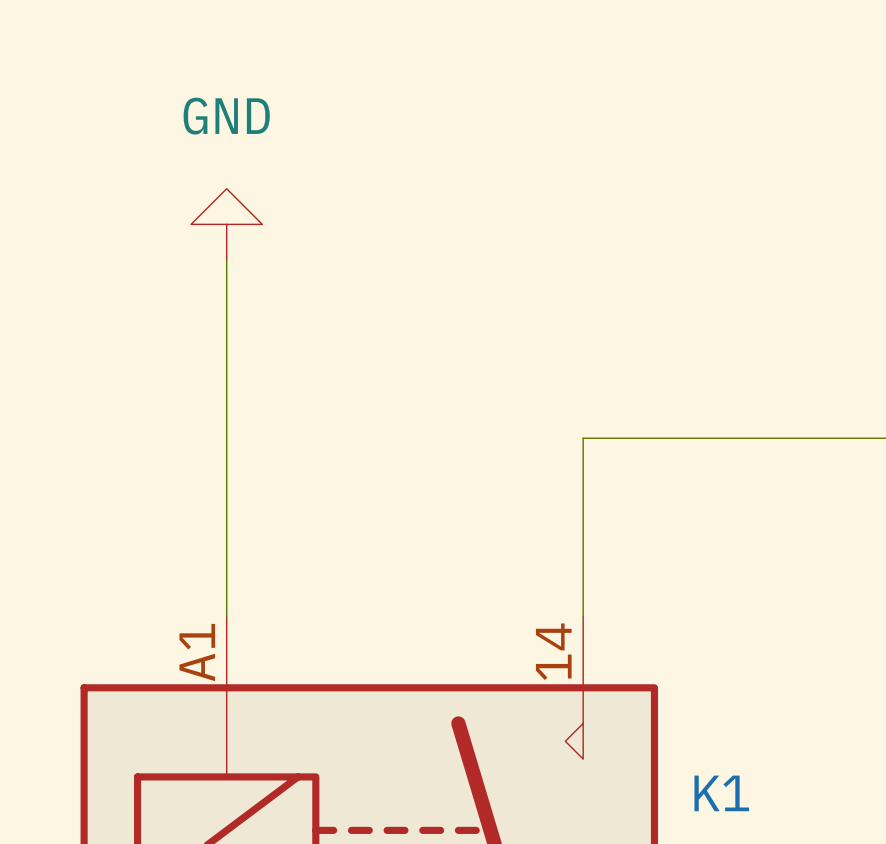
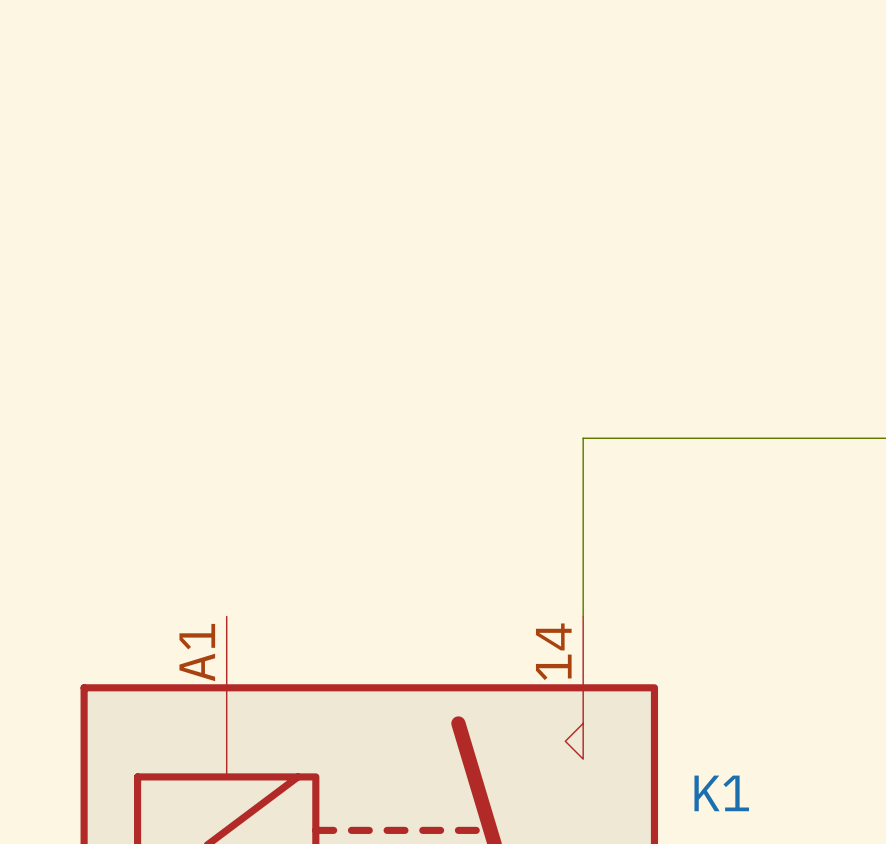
power symbol: GND (226, 224) -> none
wire: (226, 260) (226, 616) -> none

